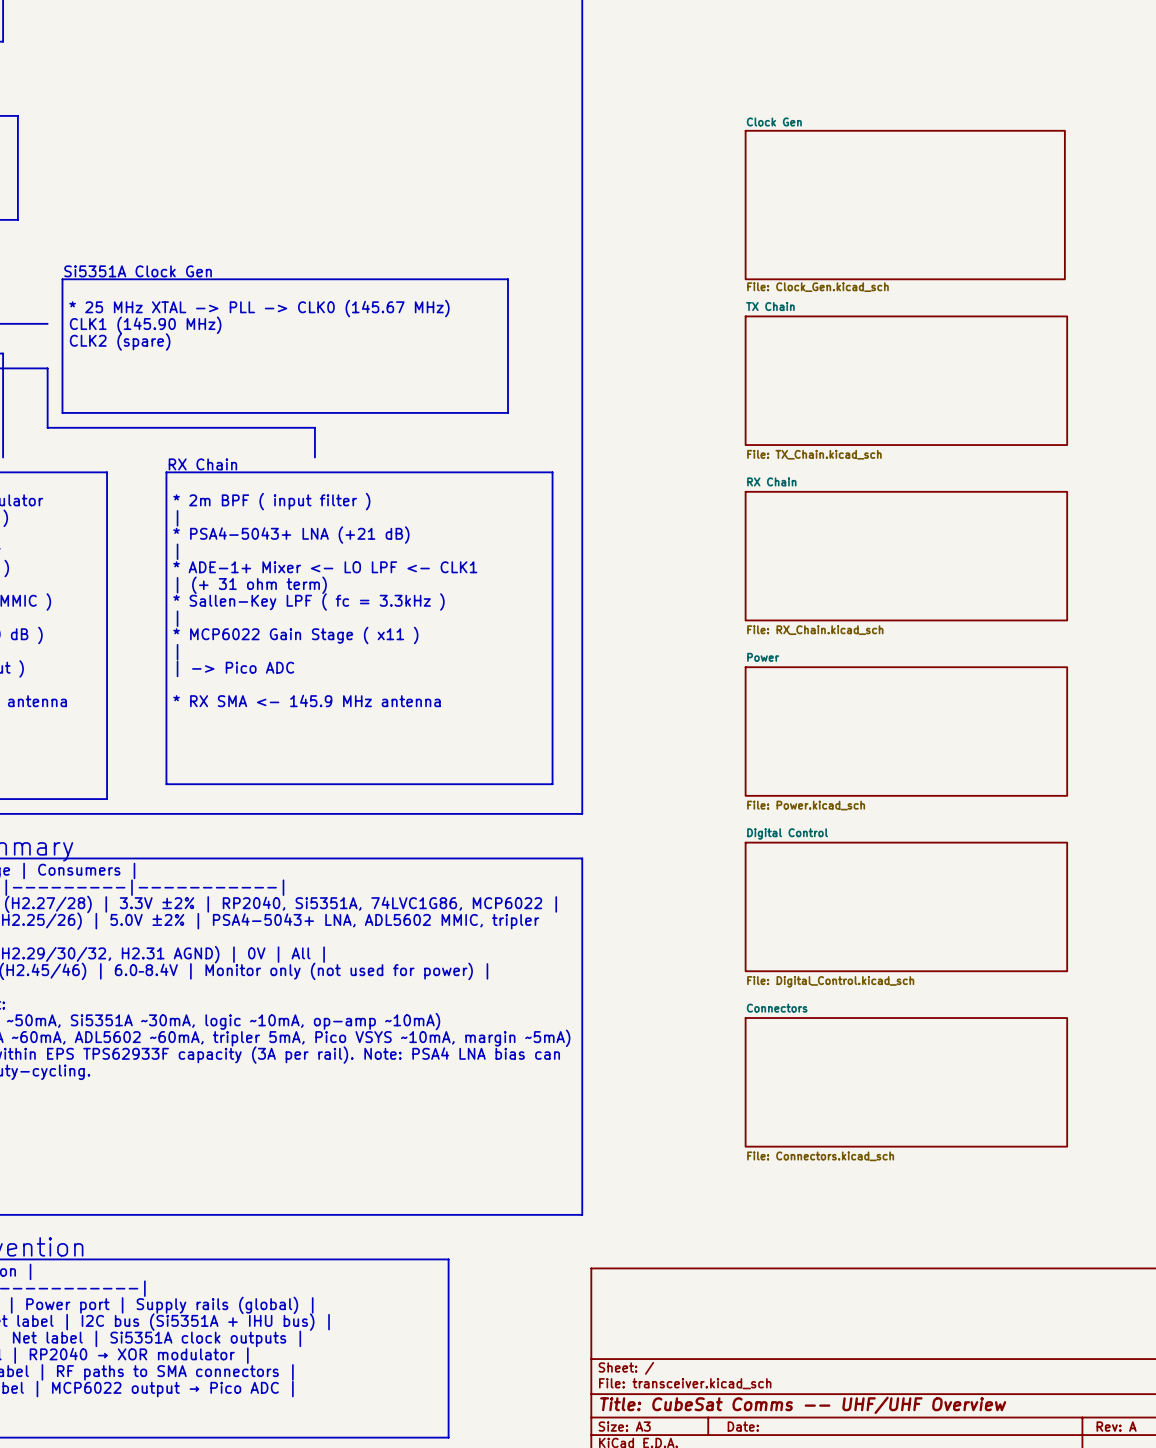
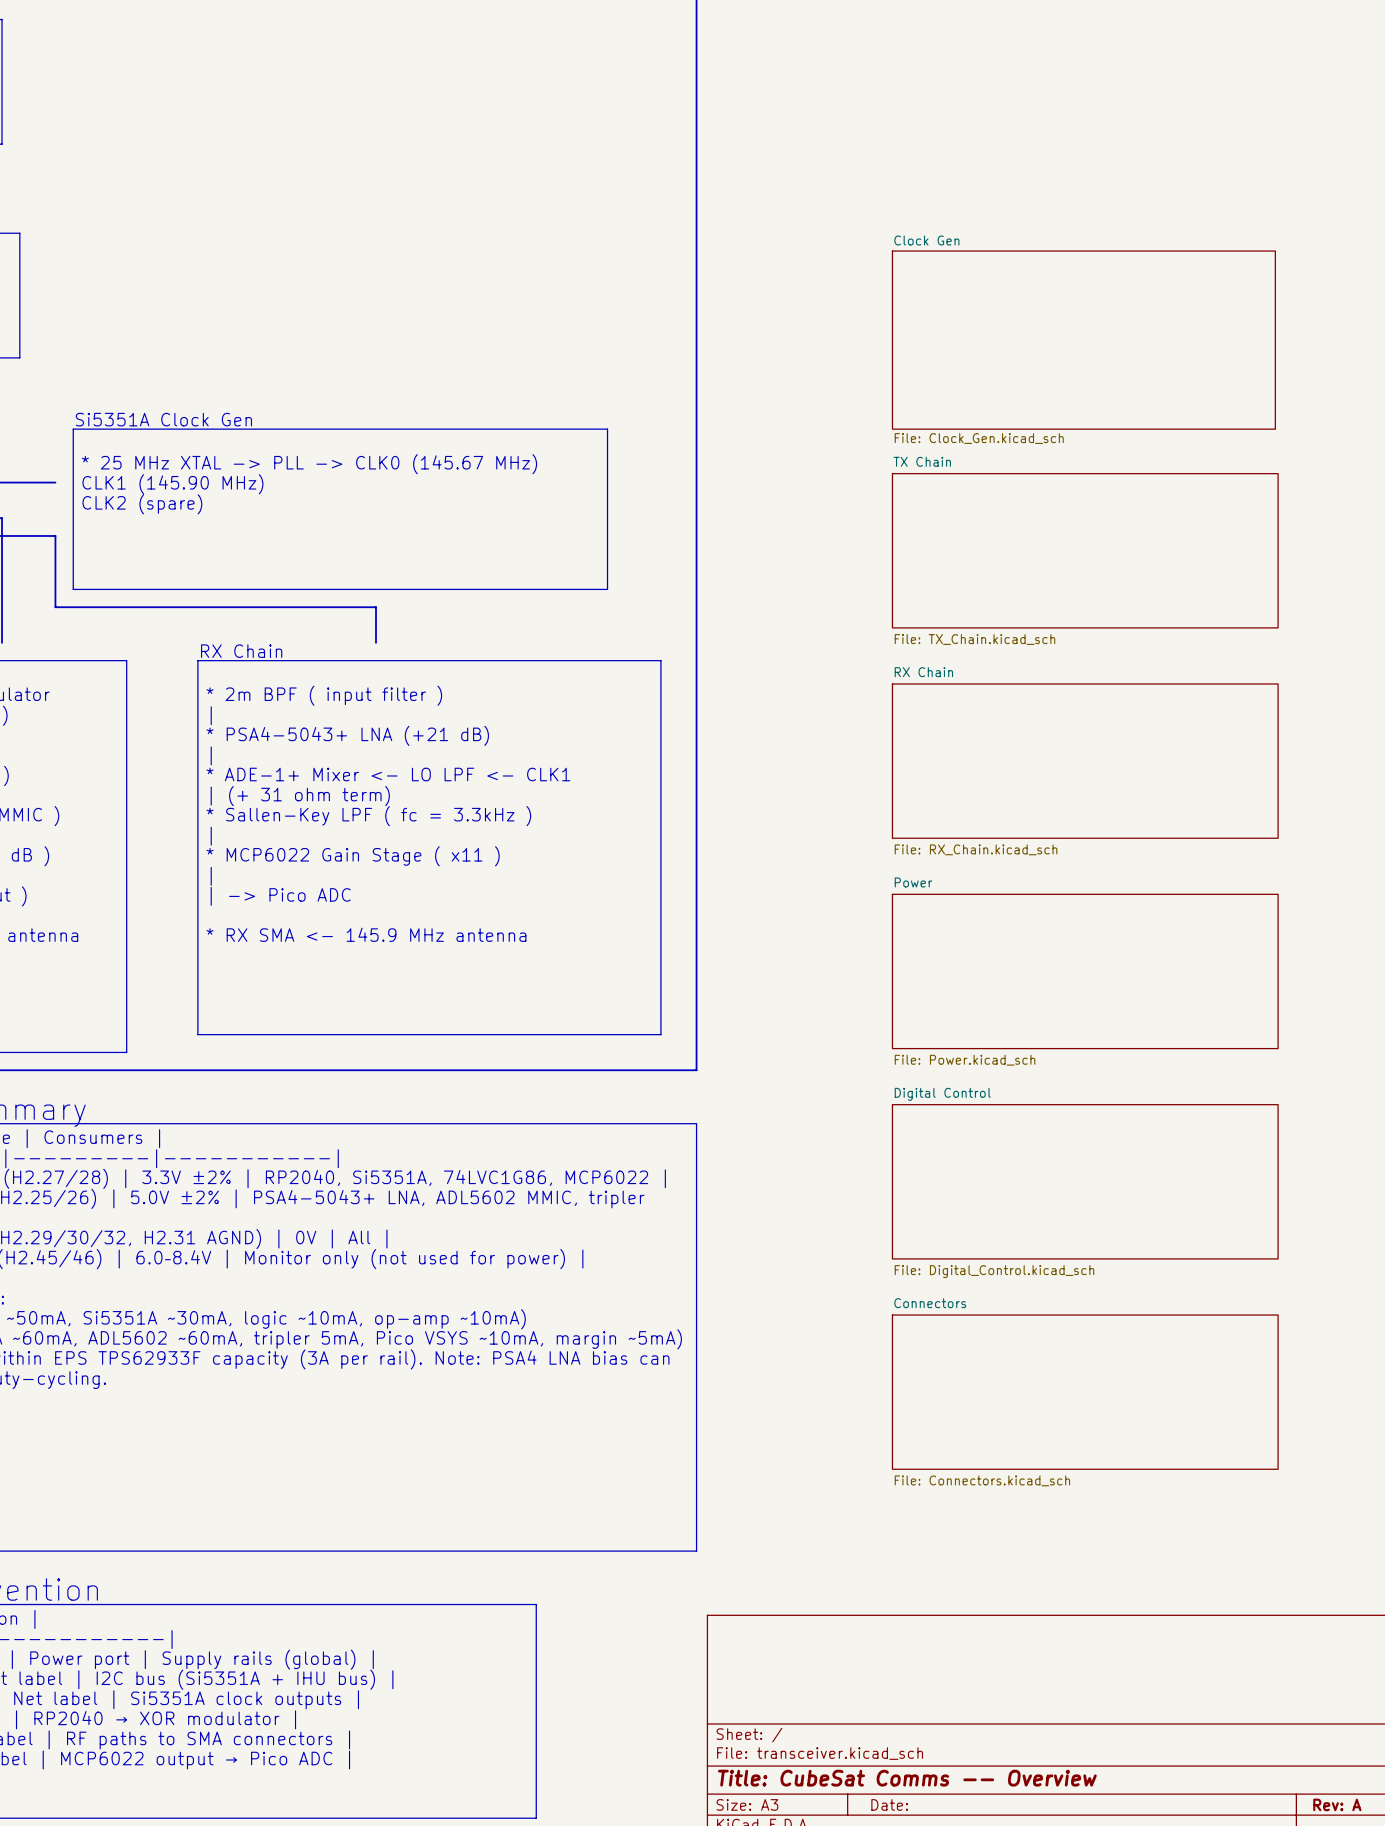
title block: Title: CubeSat Comms -- UHF/UHF Overview (803, 1405) -> Title: CubeSat Comms -- Overview (907, 1778)

